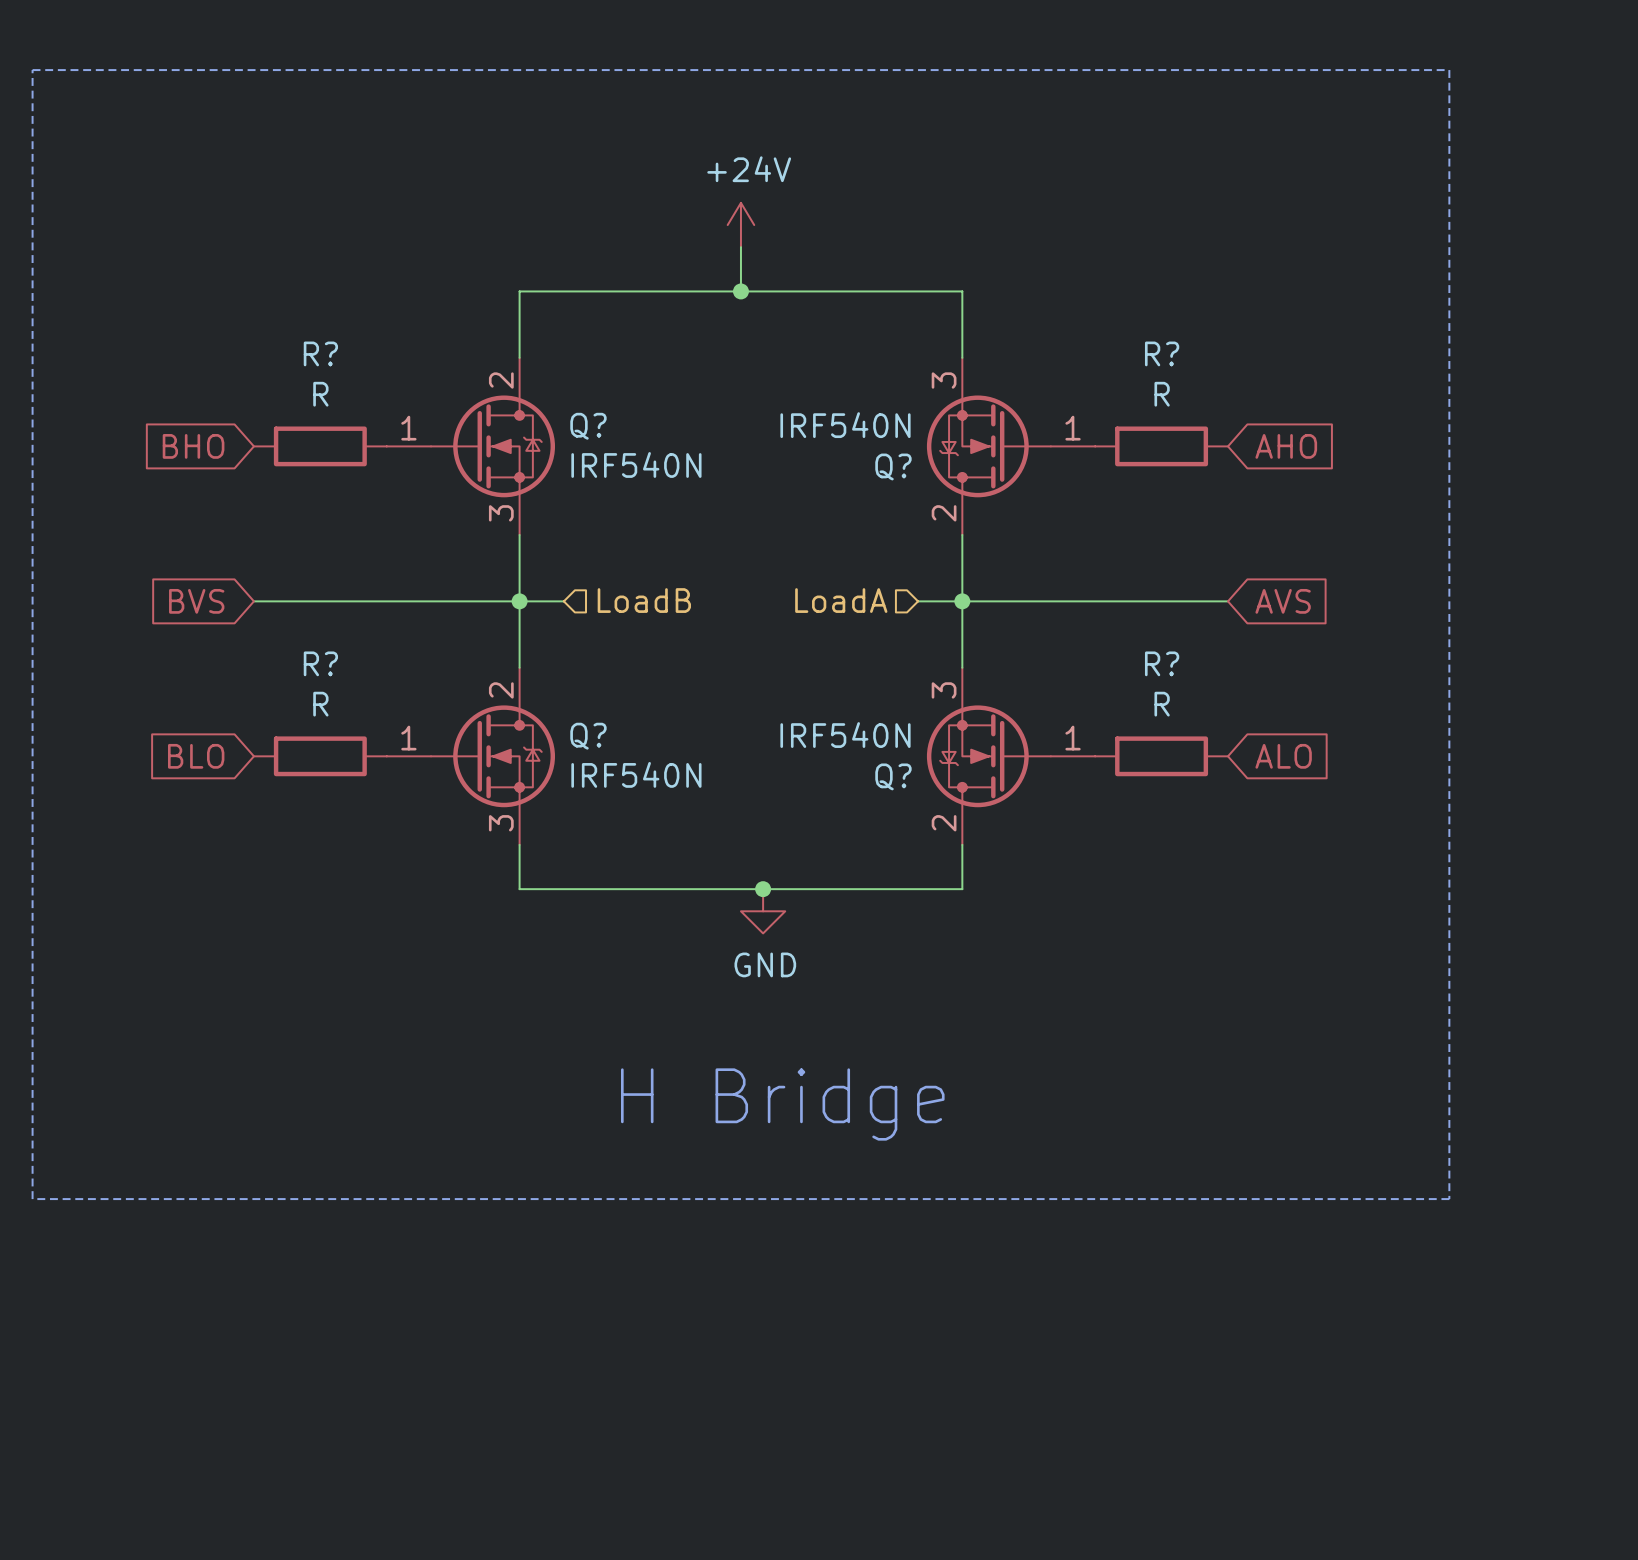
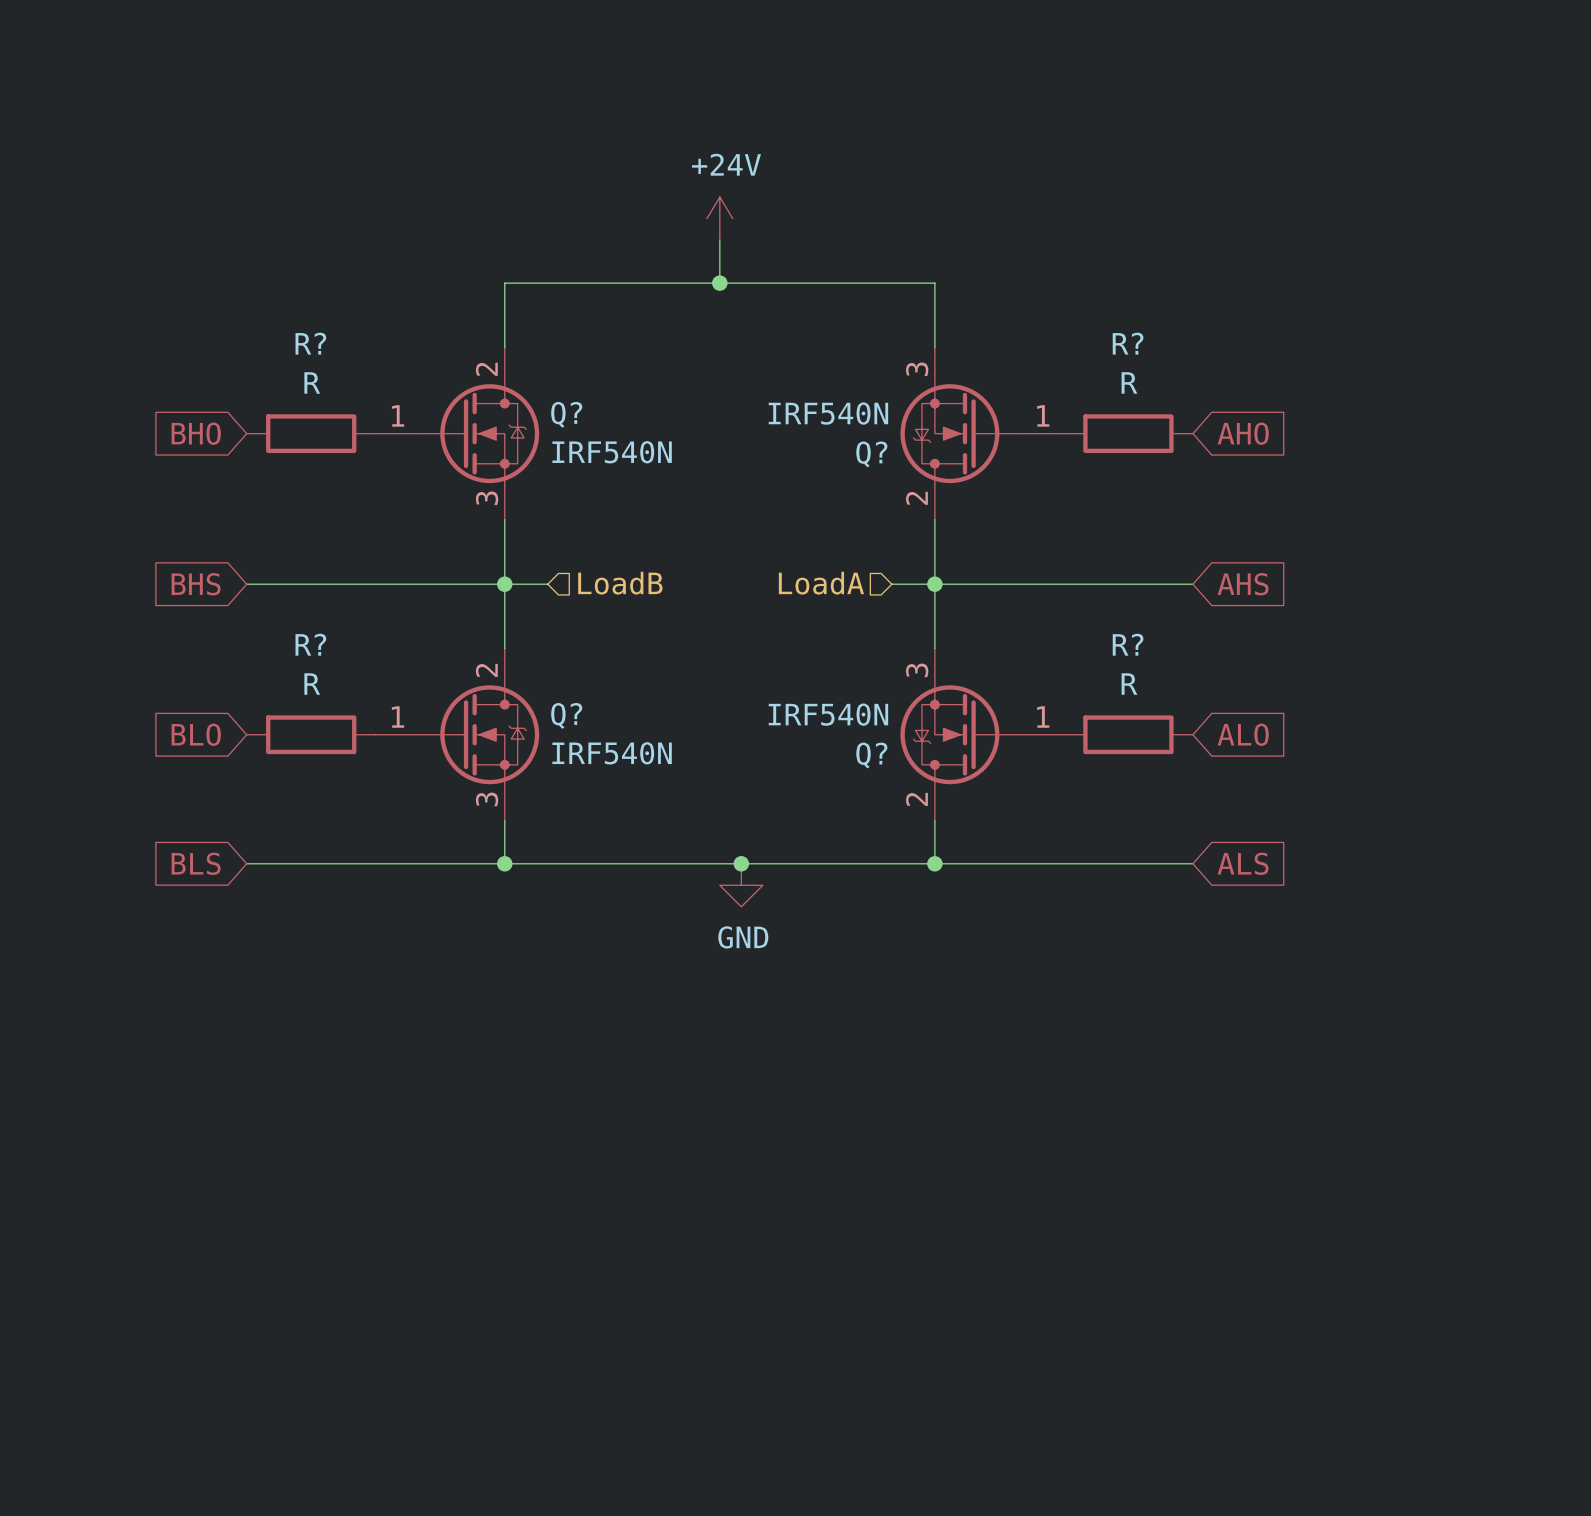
line: (32, 70) (1449, 70) (1449, 1199) (32, 1199) (32, 70) -> none
global label: BVS (196, 601) -> BHS (196, 584)
global label: AVS (1283, 601) -> AHS (1243, 584)
global label: none -> BLS (196, 863)
wire: none -> (246, 863) (504, 863)
junction: none -> (504, 863)
wire: none -> (934, 863) (1192, 863)
junction: none -> (934, 863)
global label: none -> ALS (1243, 863)
text: H Bridge (782, 1104) -> none

